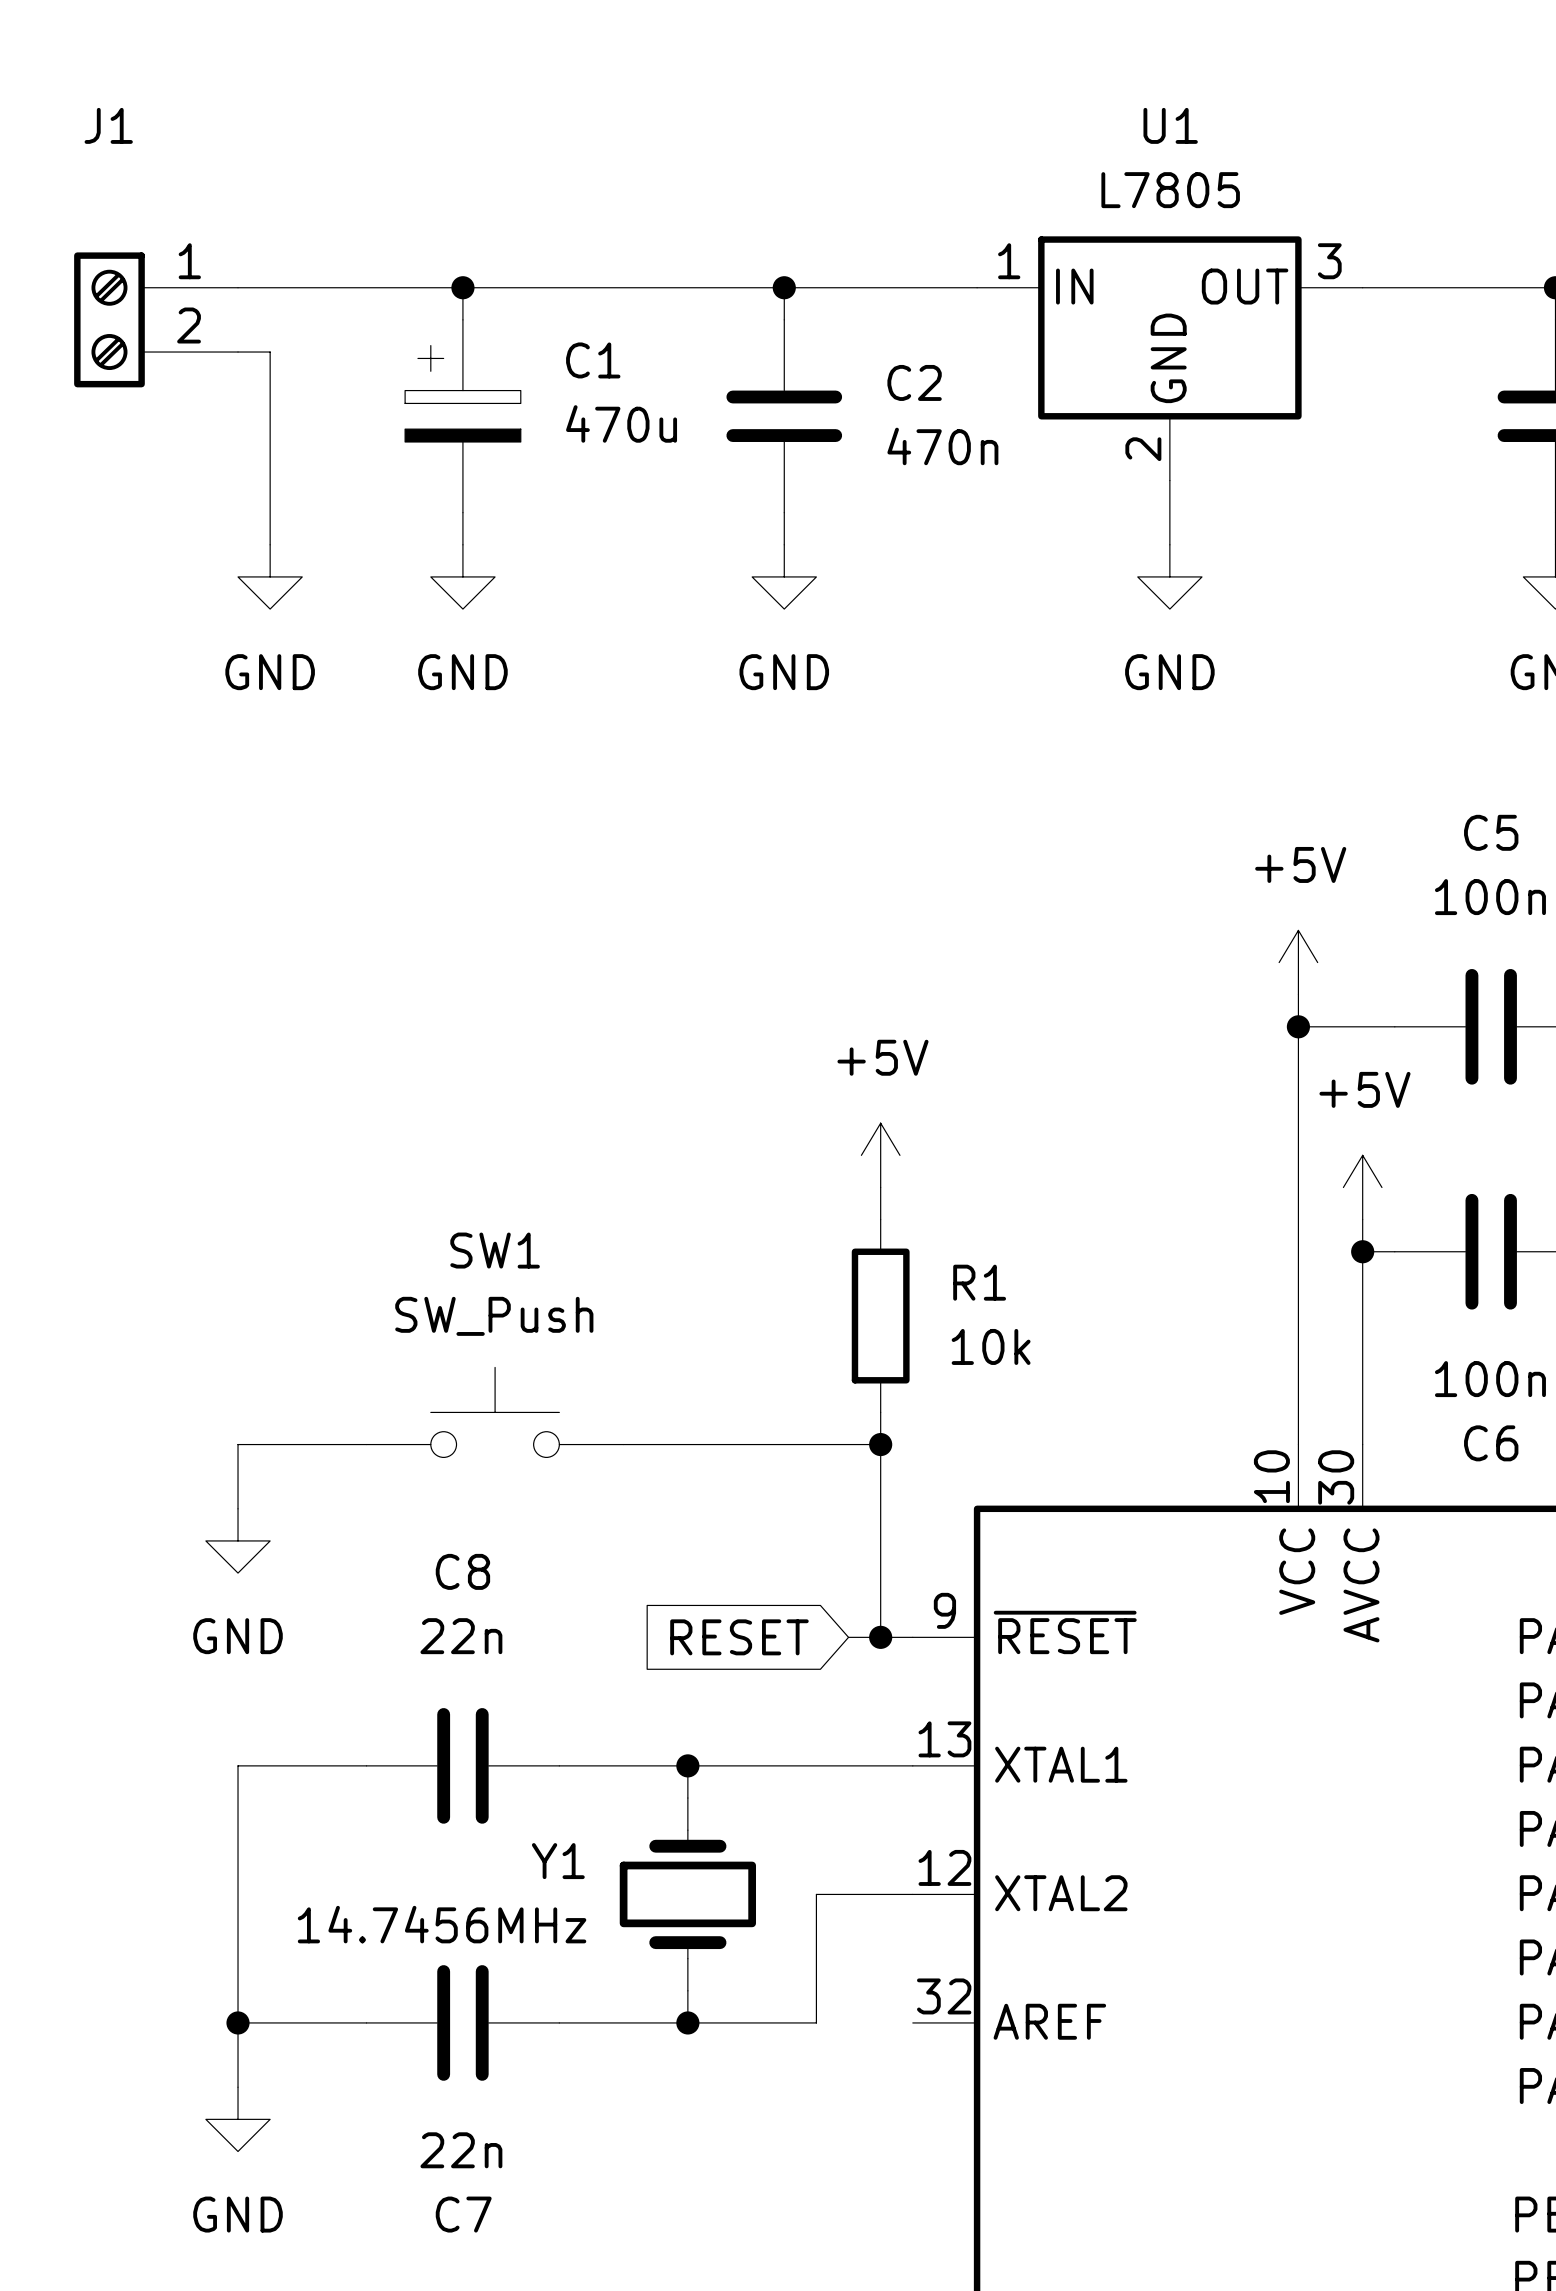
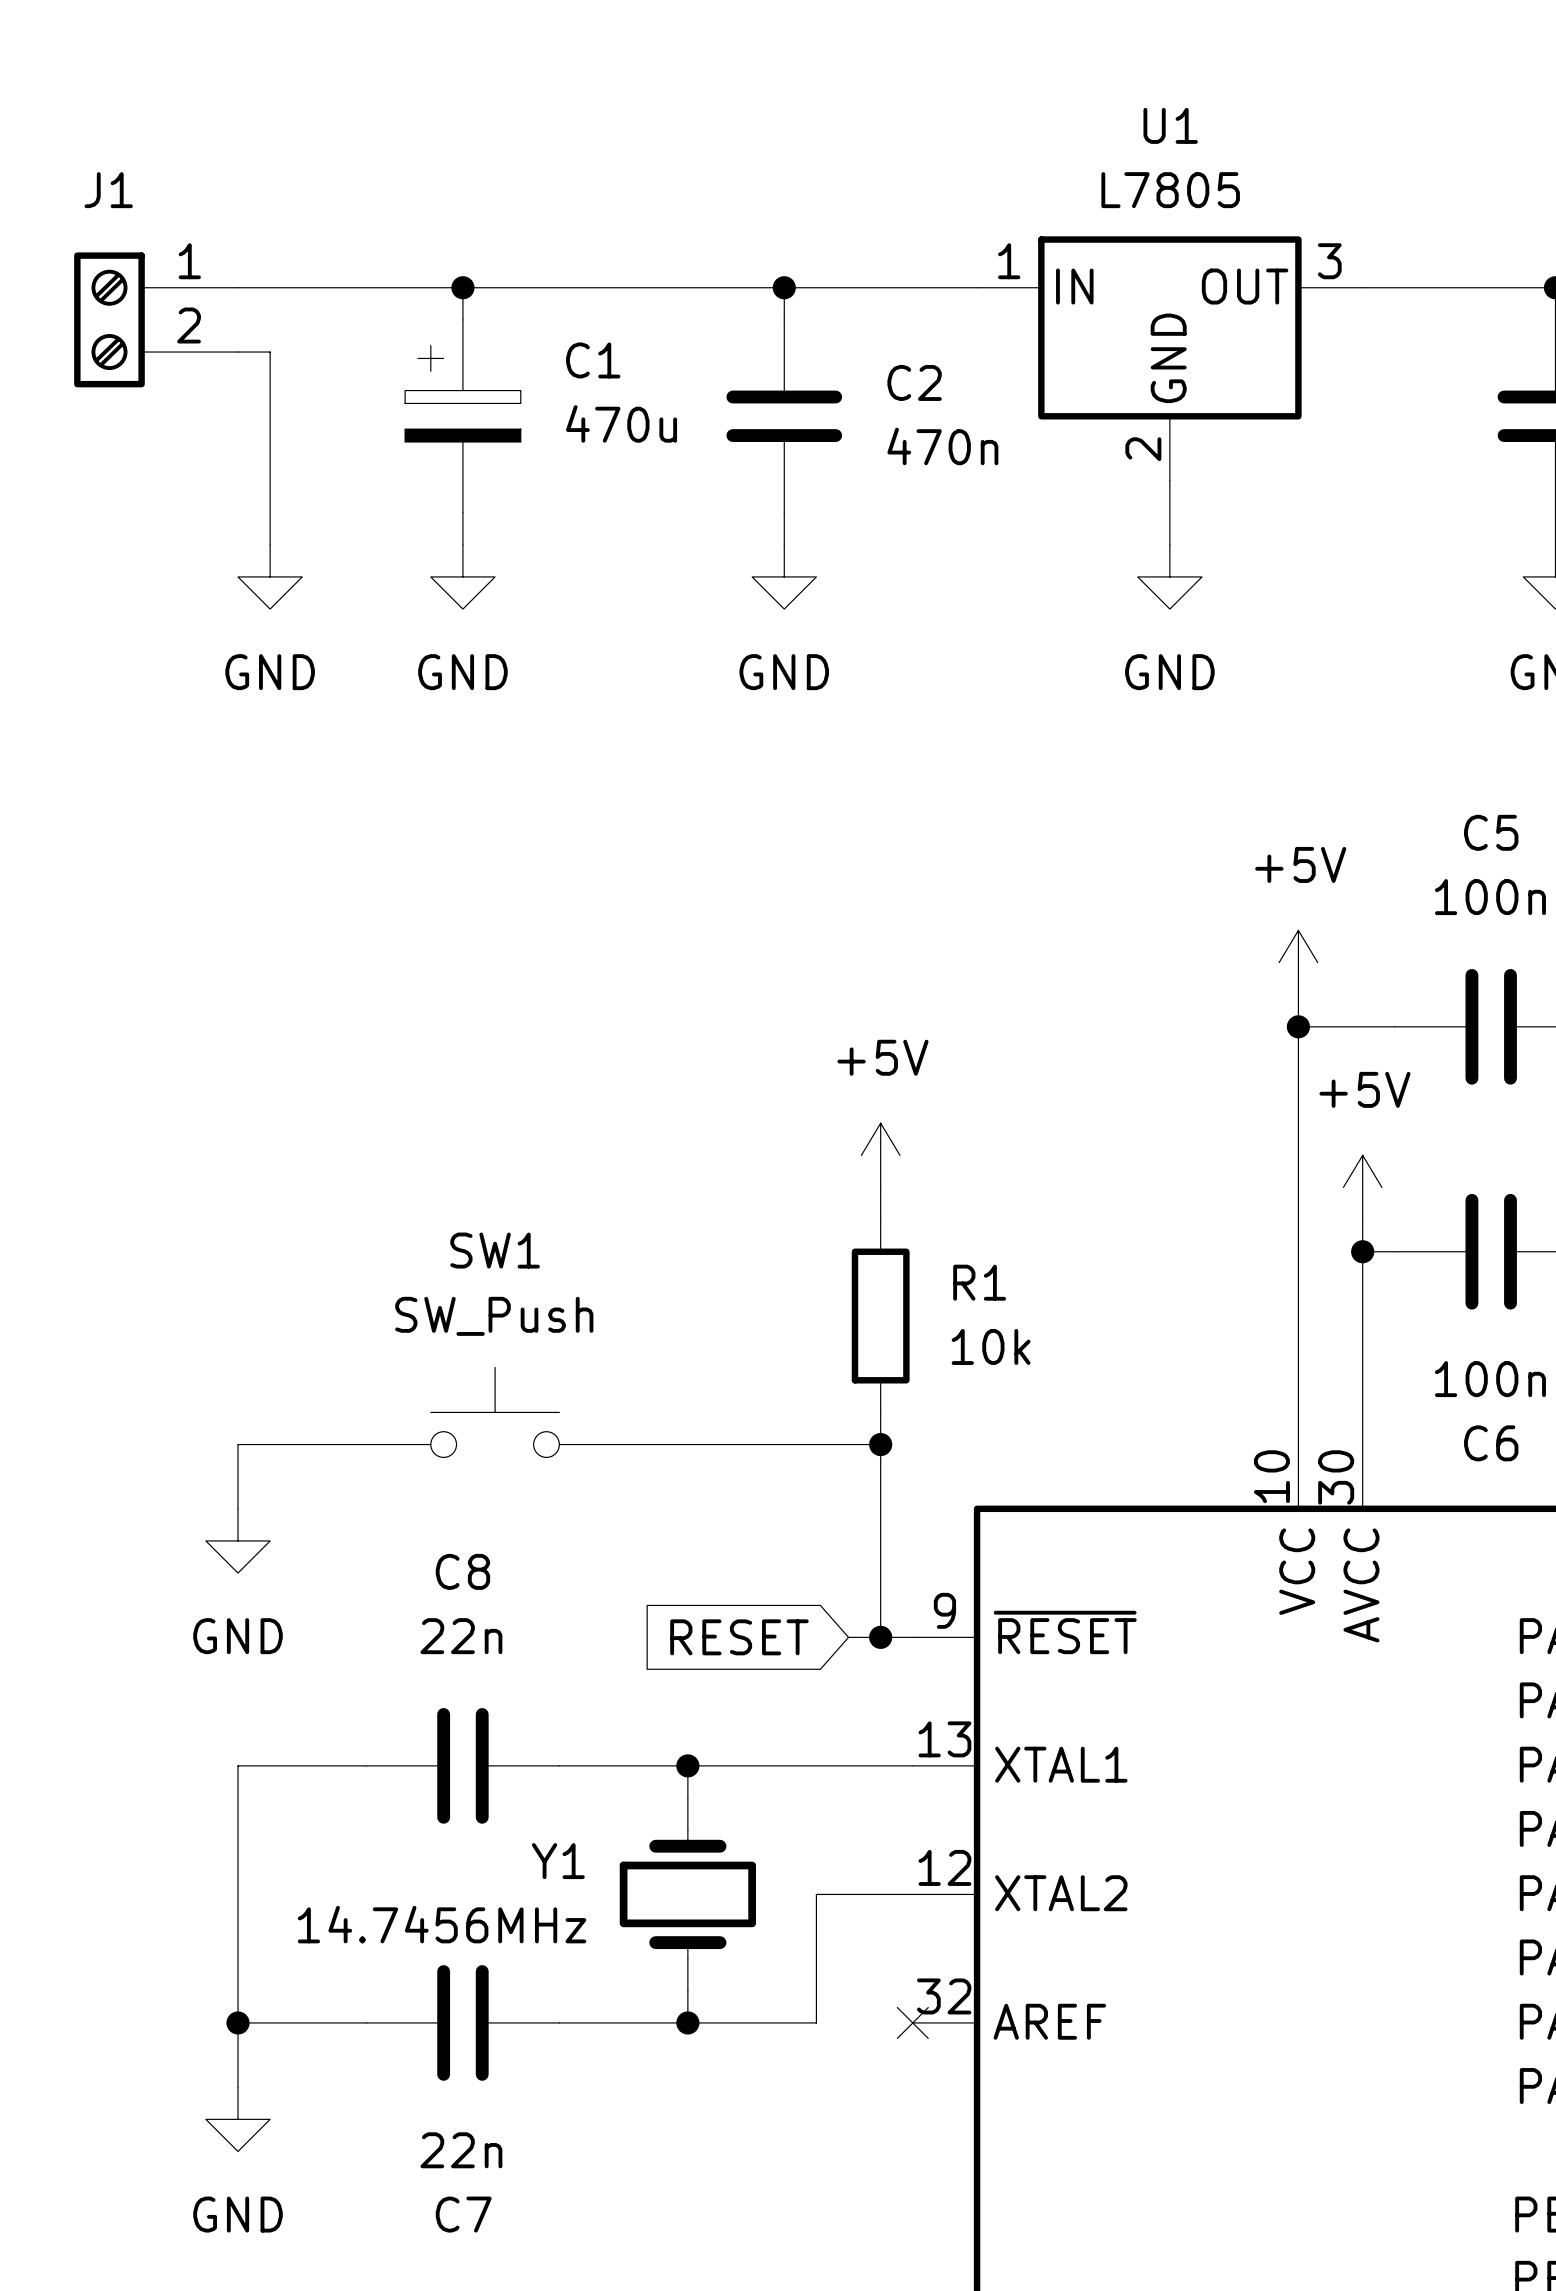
J1 name position: J1 (108, 125) -> J1 (108, 190)
no-connect mark: none -> (912, 2022)

